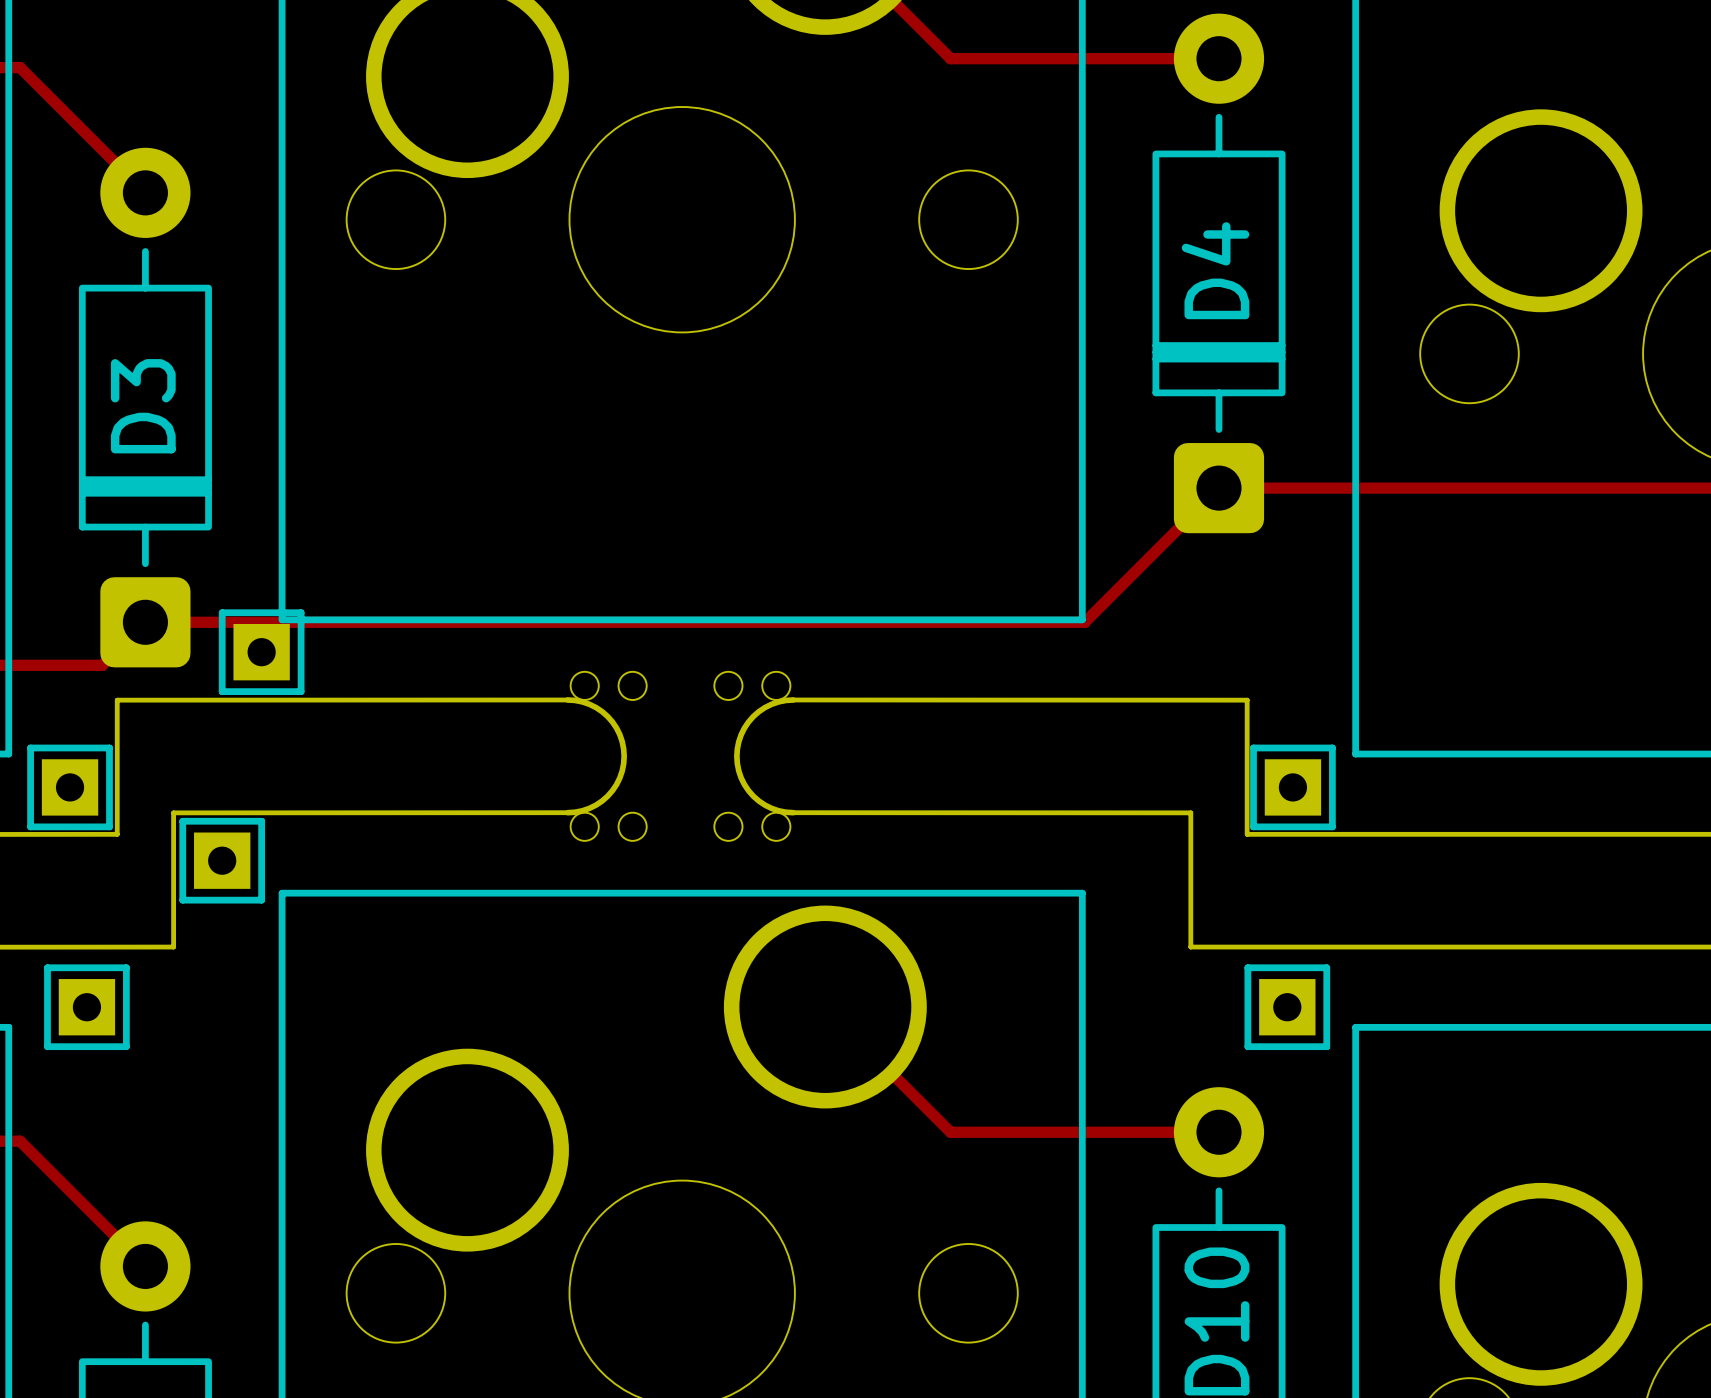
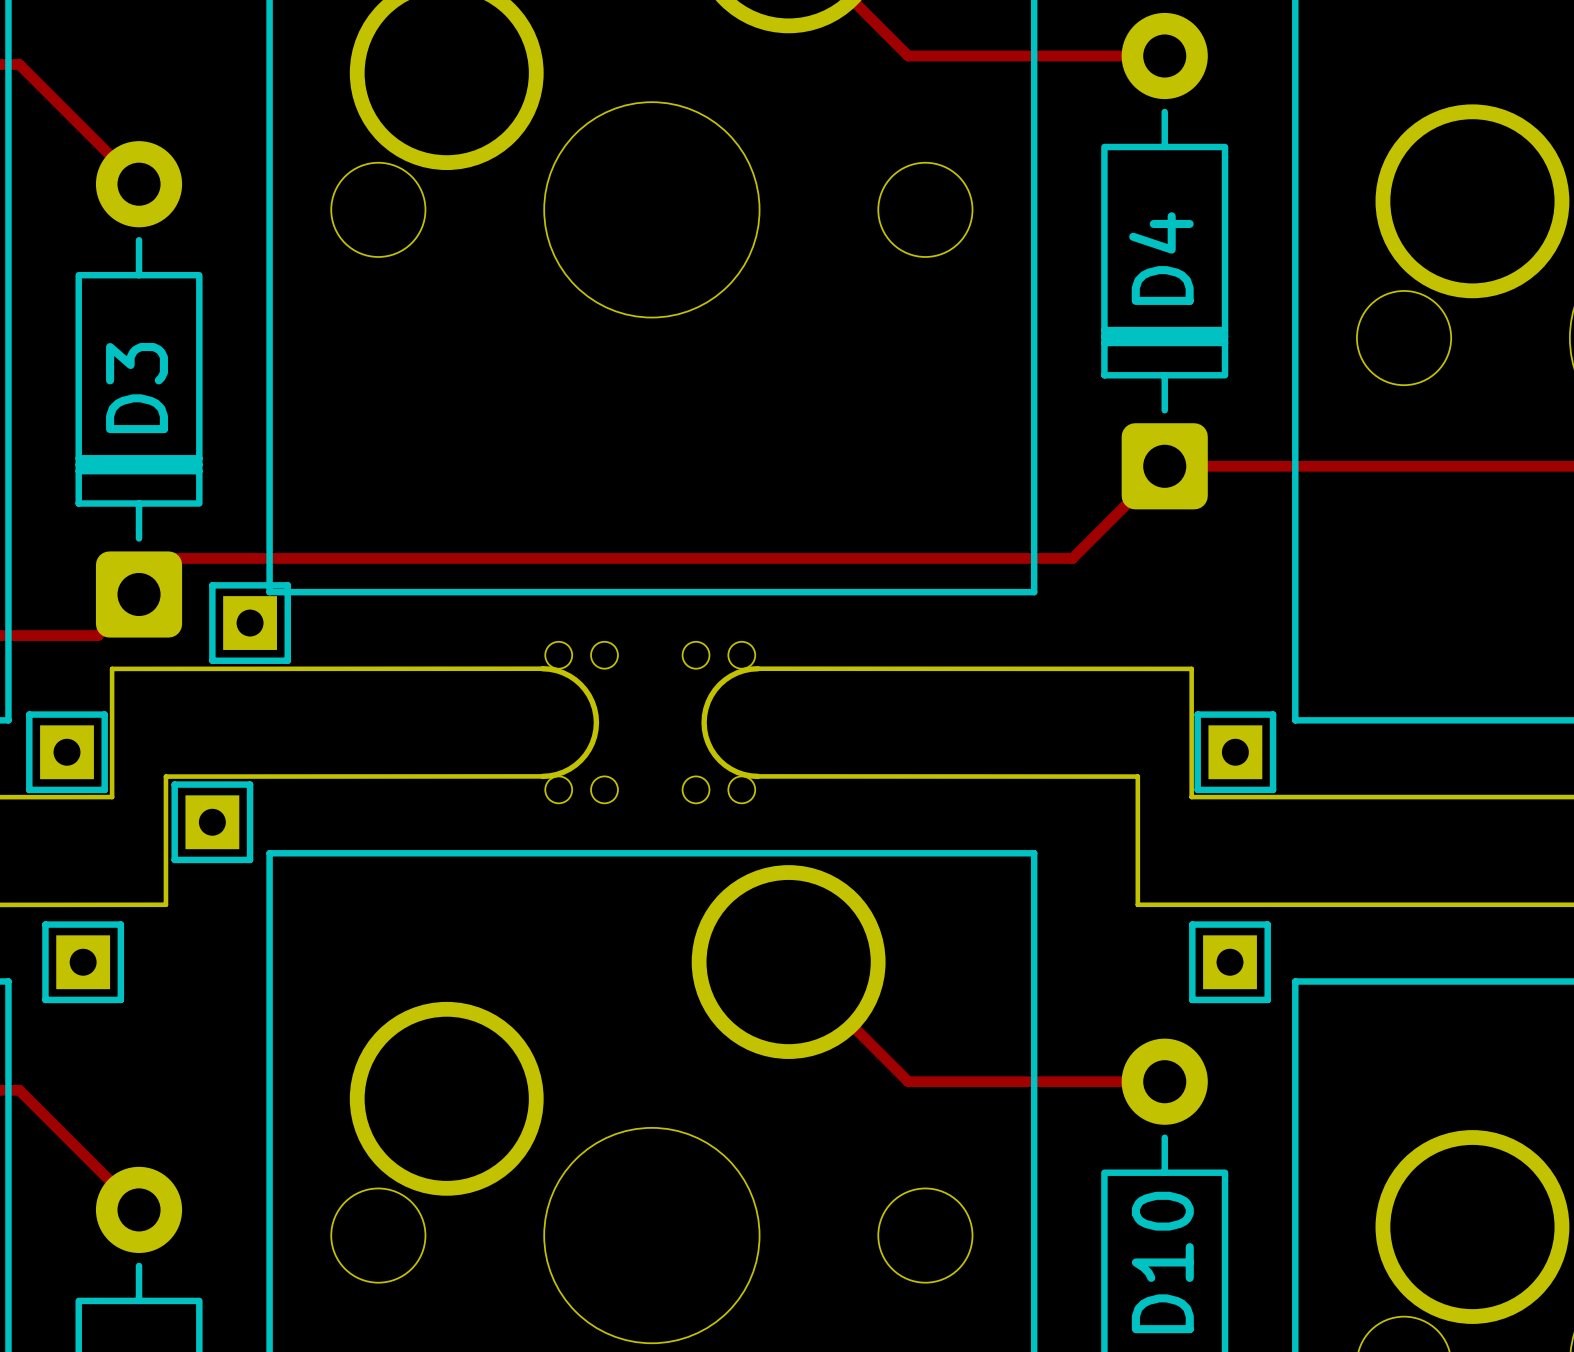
track: (1122, 584) (1084, 622) (145, 622) -> (1072, 558) (175, 558) (139, 594)

